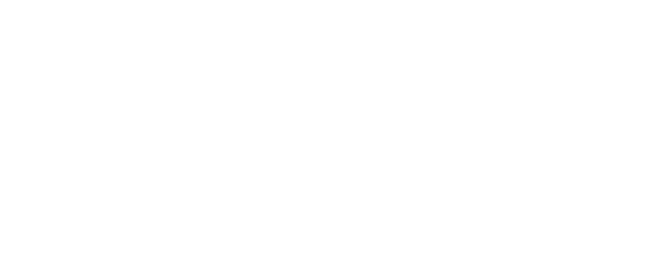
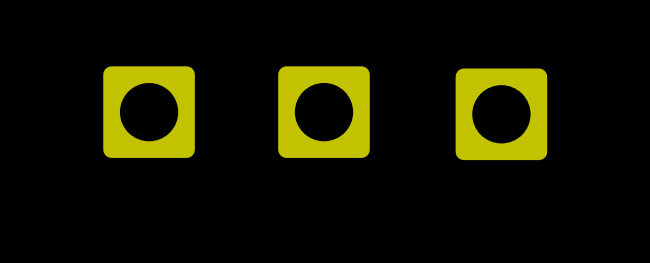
part: none -> (149, 112)
part: none -> (323, 112)
part: none -> (501, 114)

